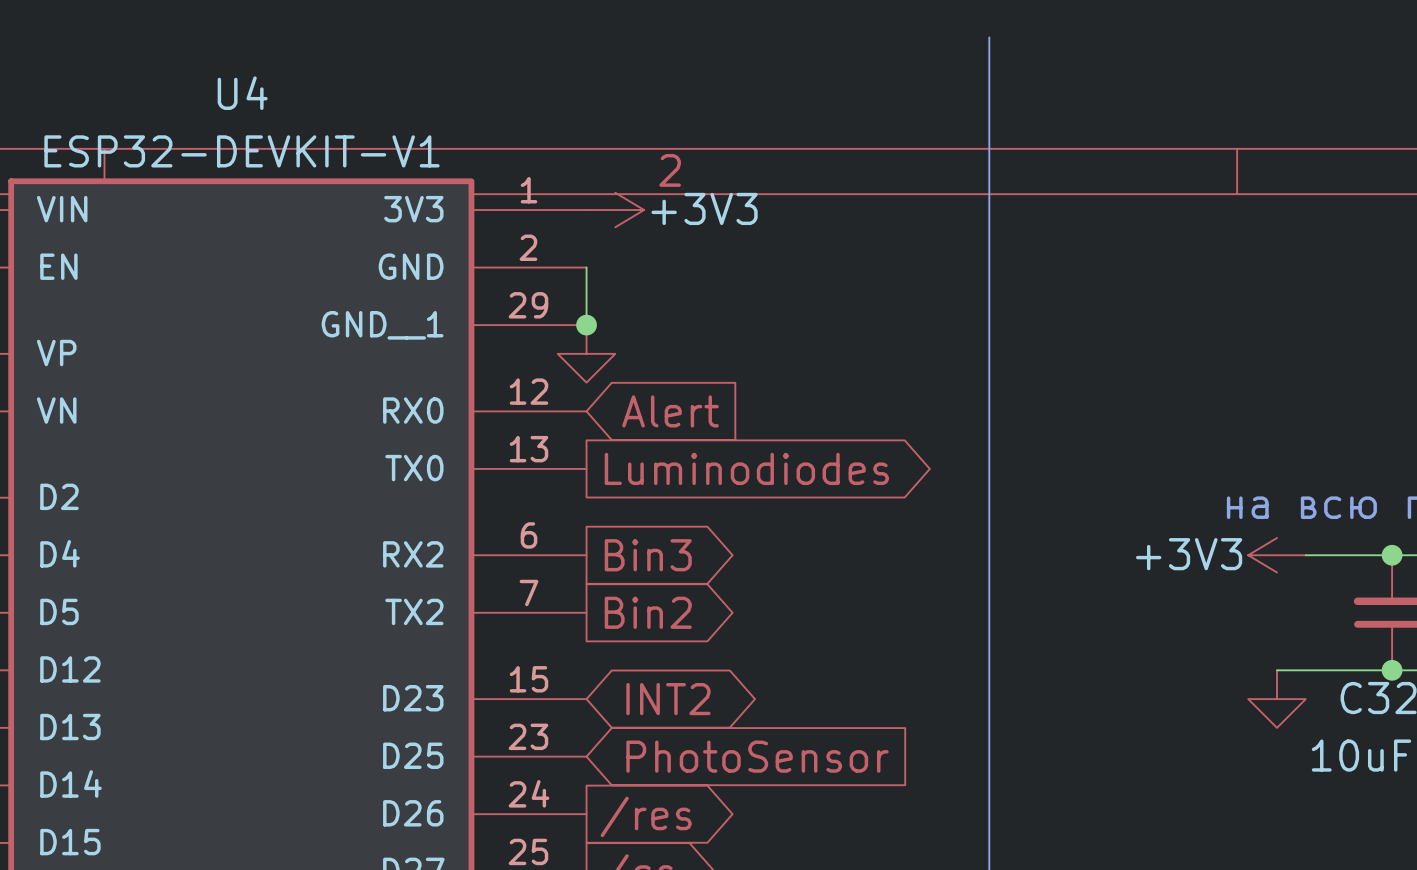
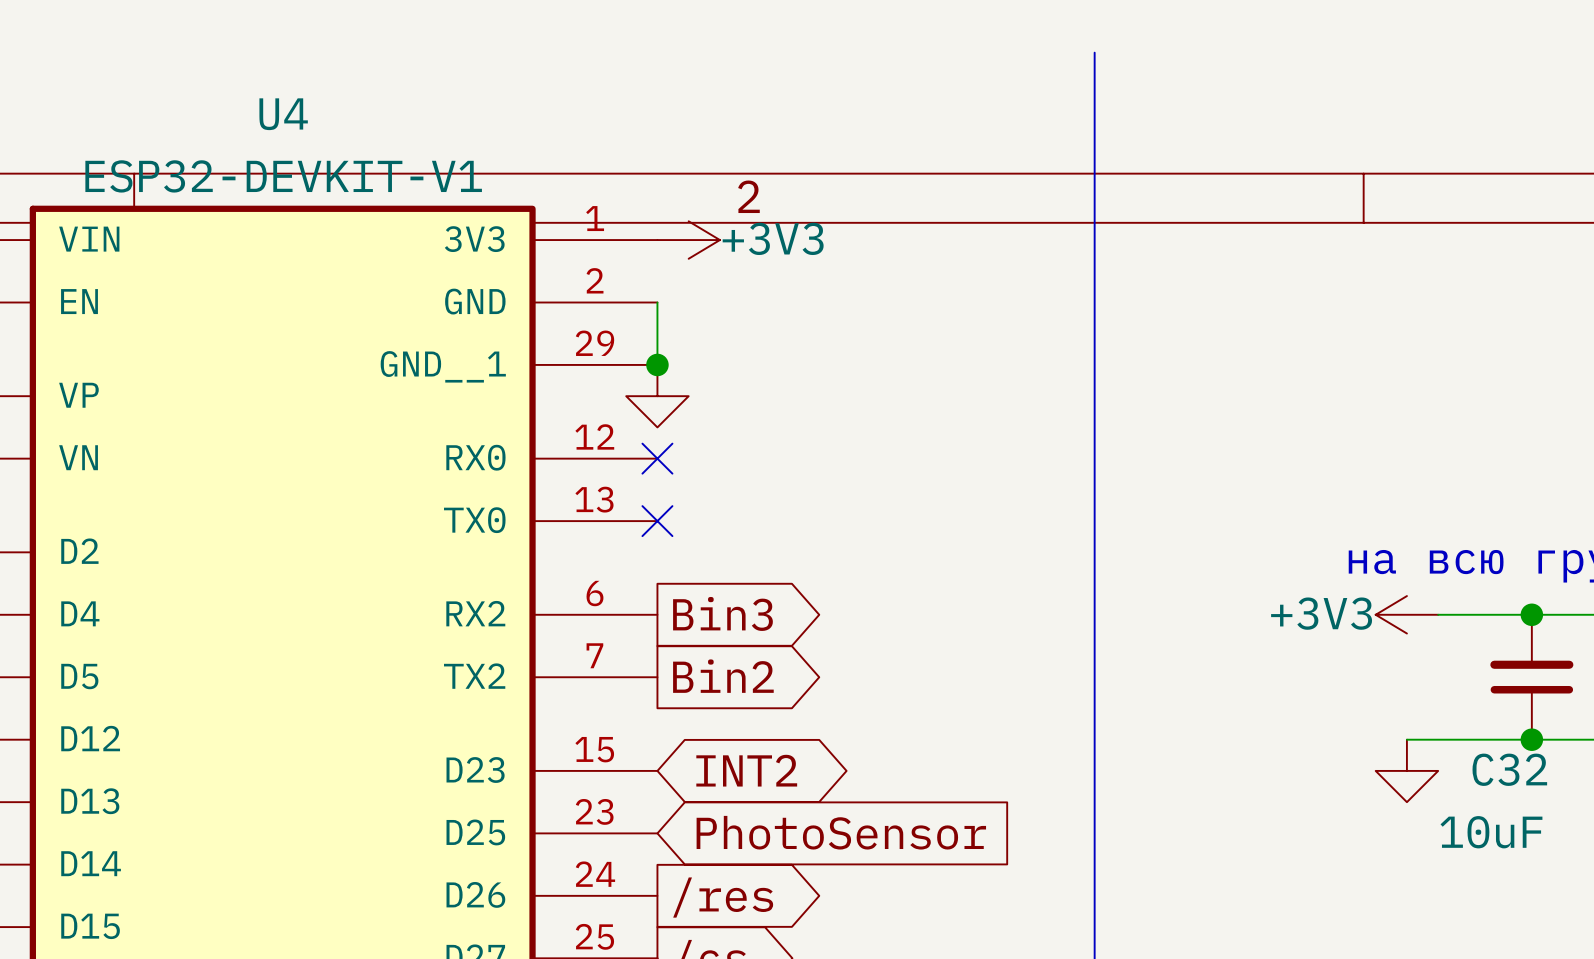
no-connect mark: none -> (657, 458)
global label: Alert (670, 411) -> none
no-connect mark: none -> (657, 521)
global label: Luminodiodes (746, 468) -> none

